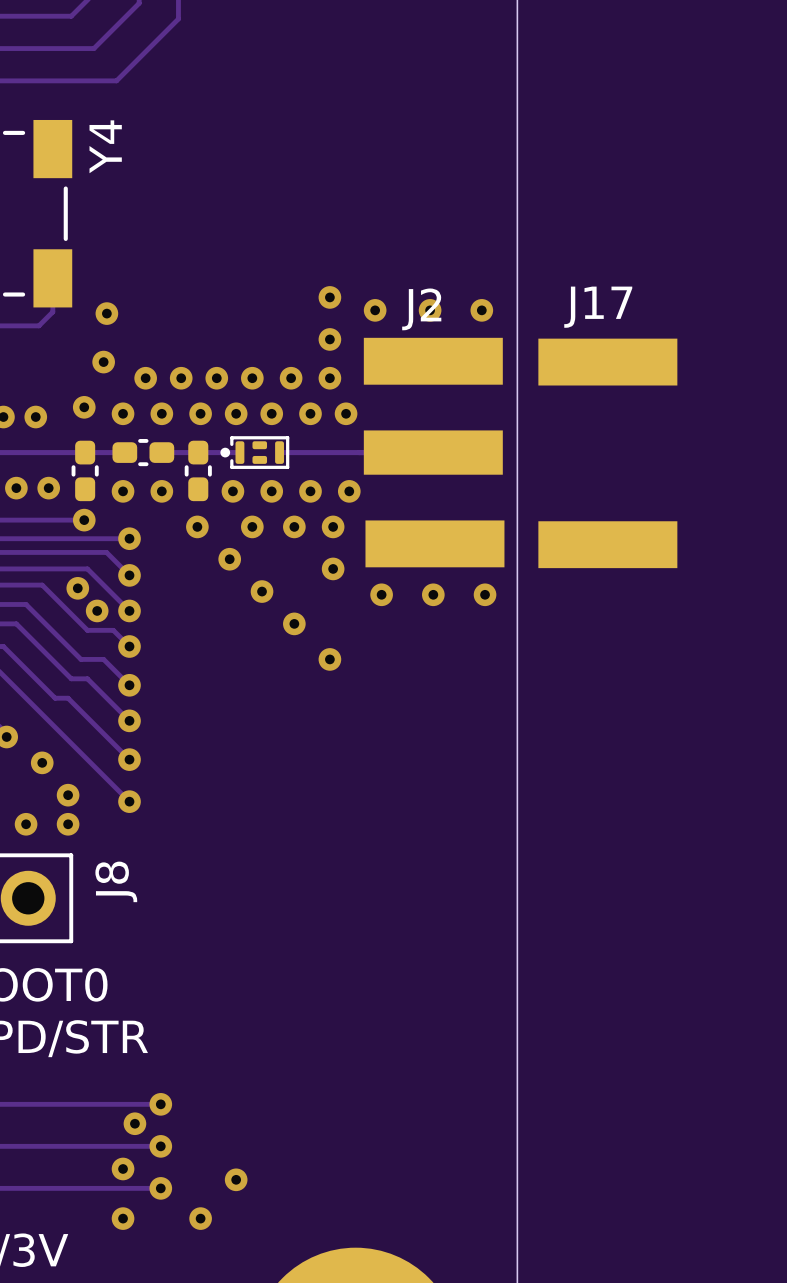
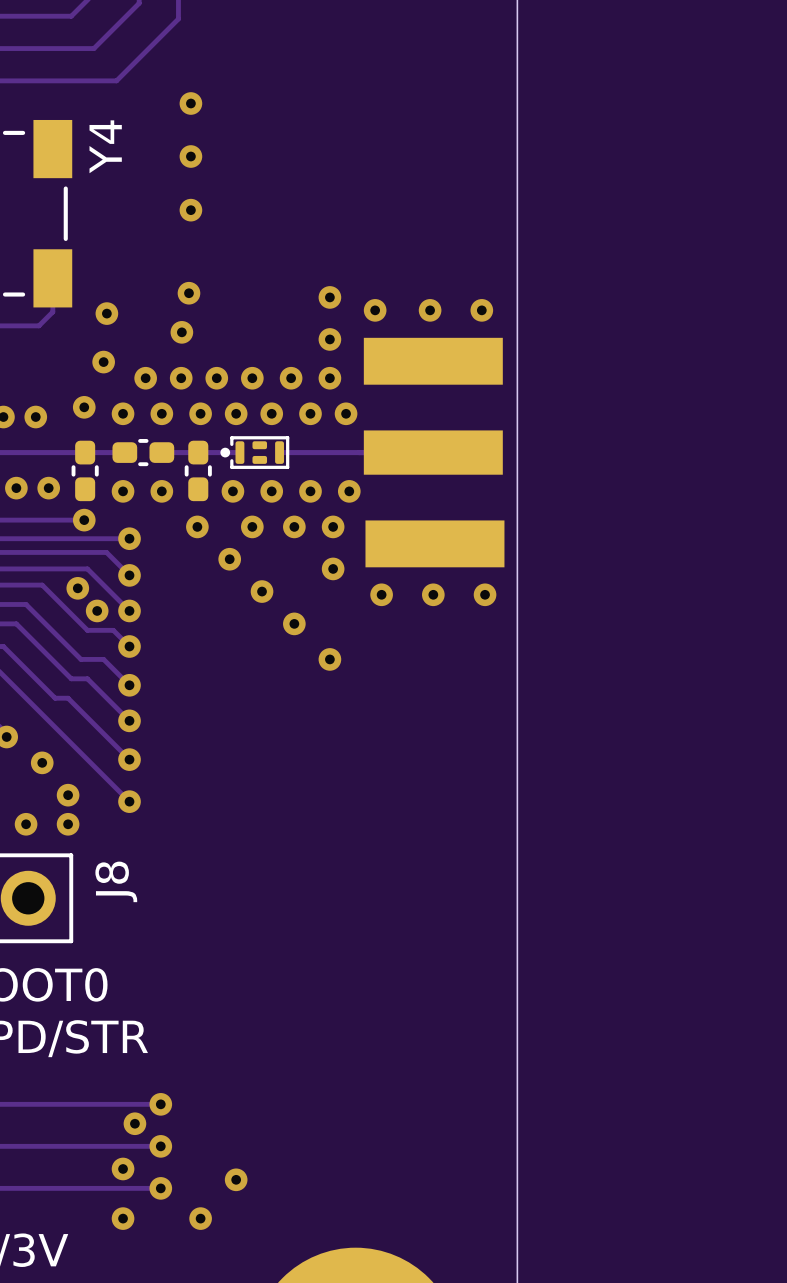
via: none -> (190, 103)
via: none -> (190, 156)
via: none -> (190, 210)
via: none -> (188, 293)
J2 name: J2 (421, 309) -> none
via: none -> (181, 332)
J17: (607, 453) -> none

